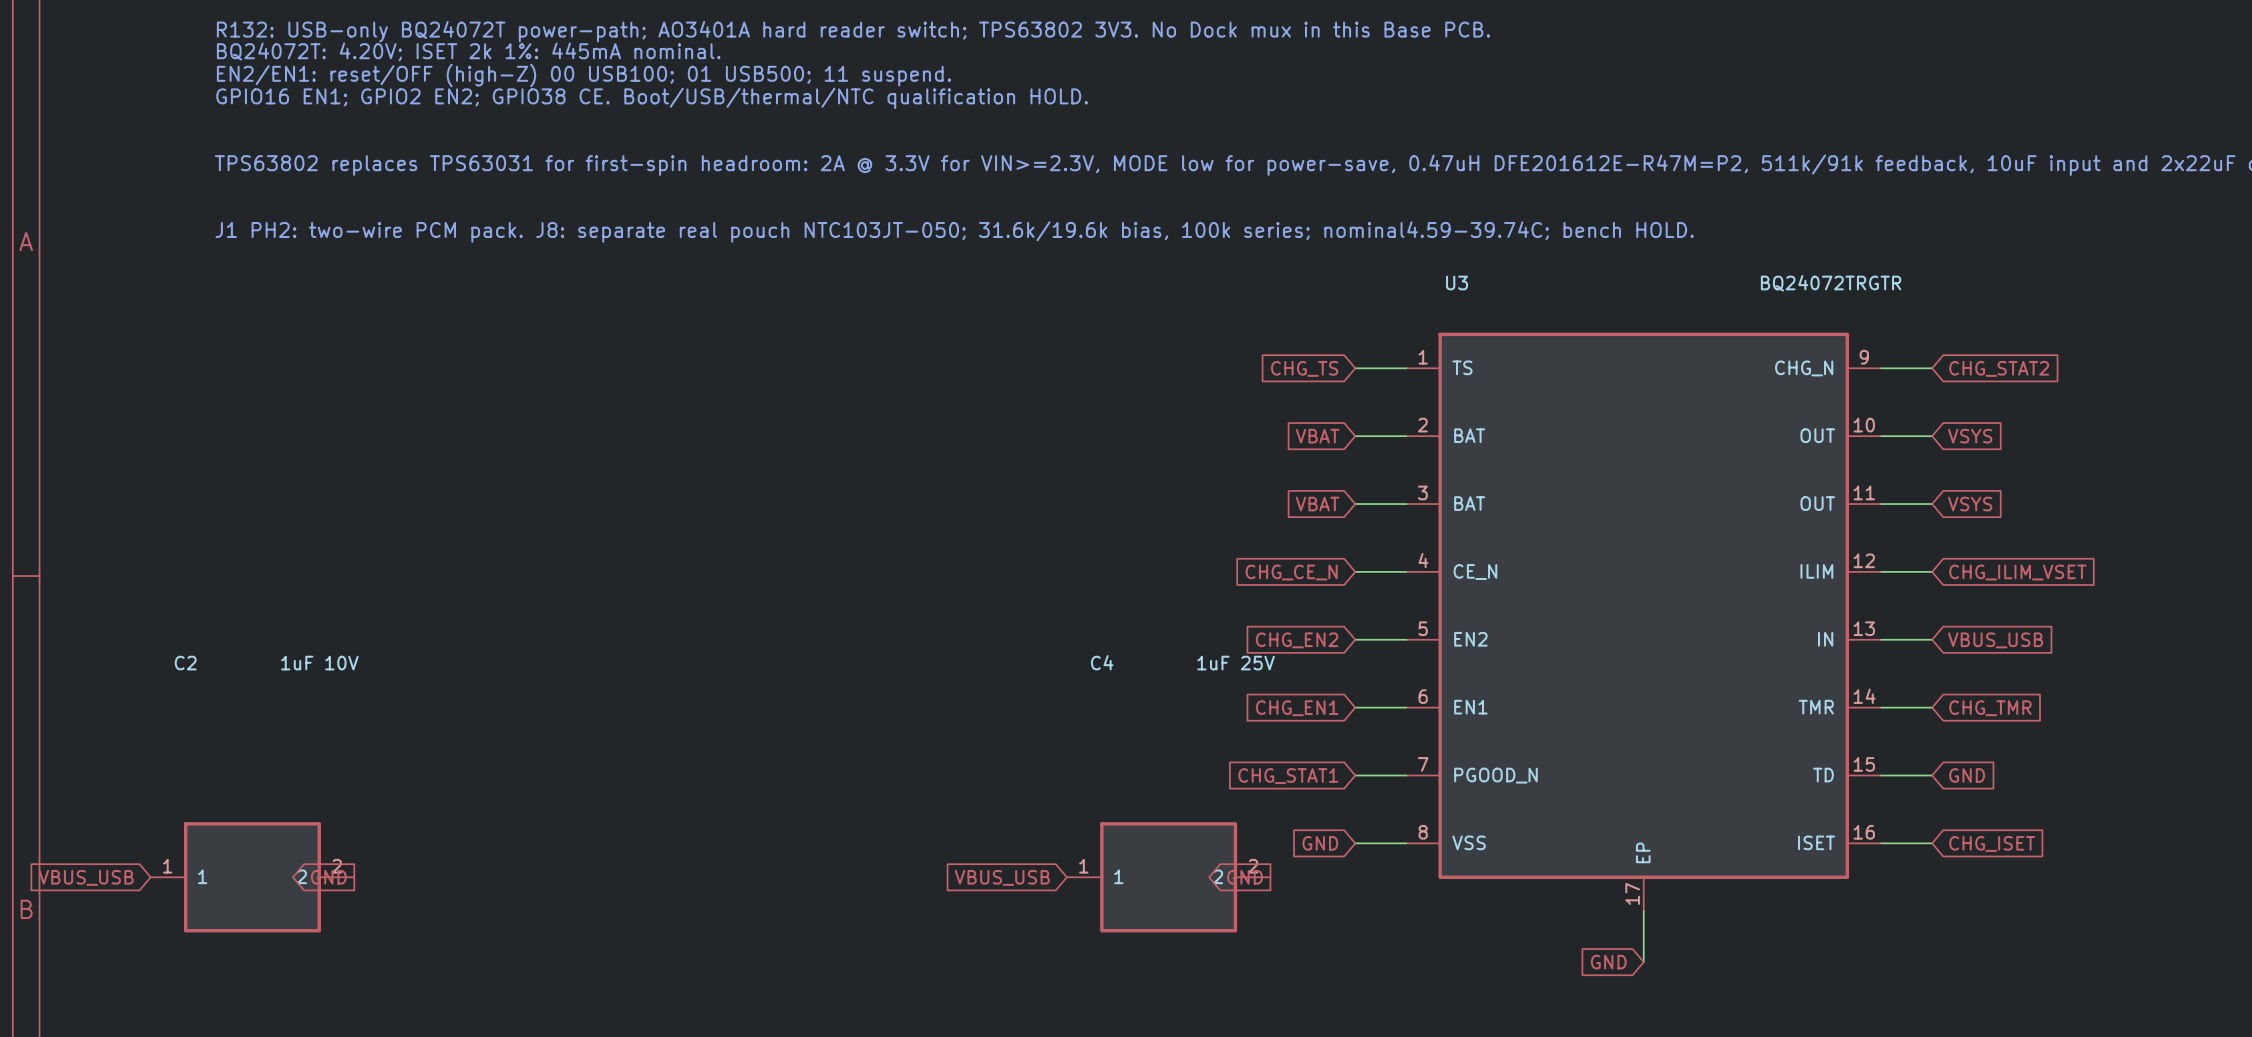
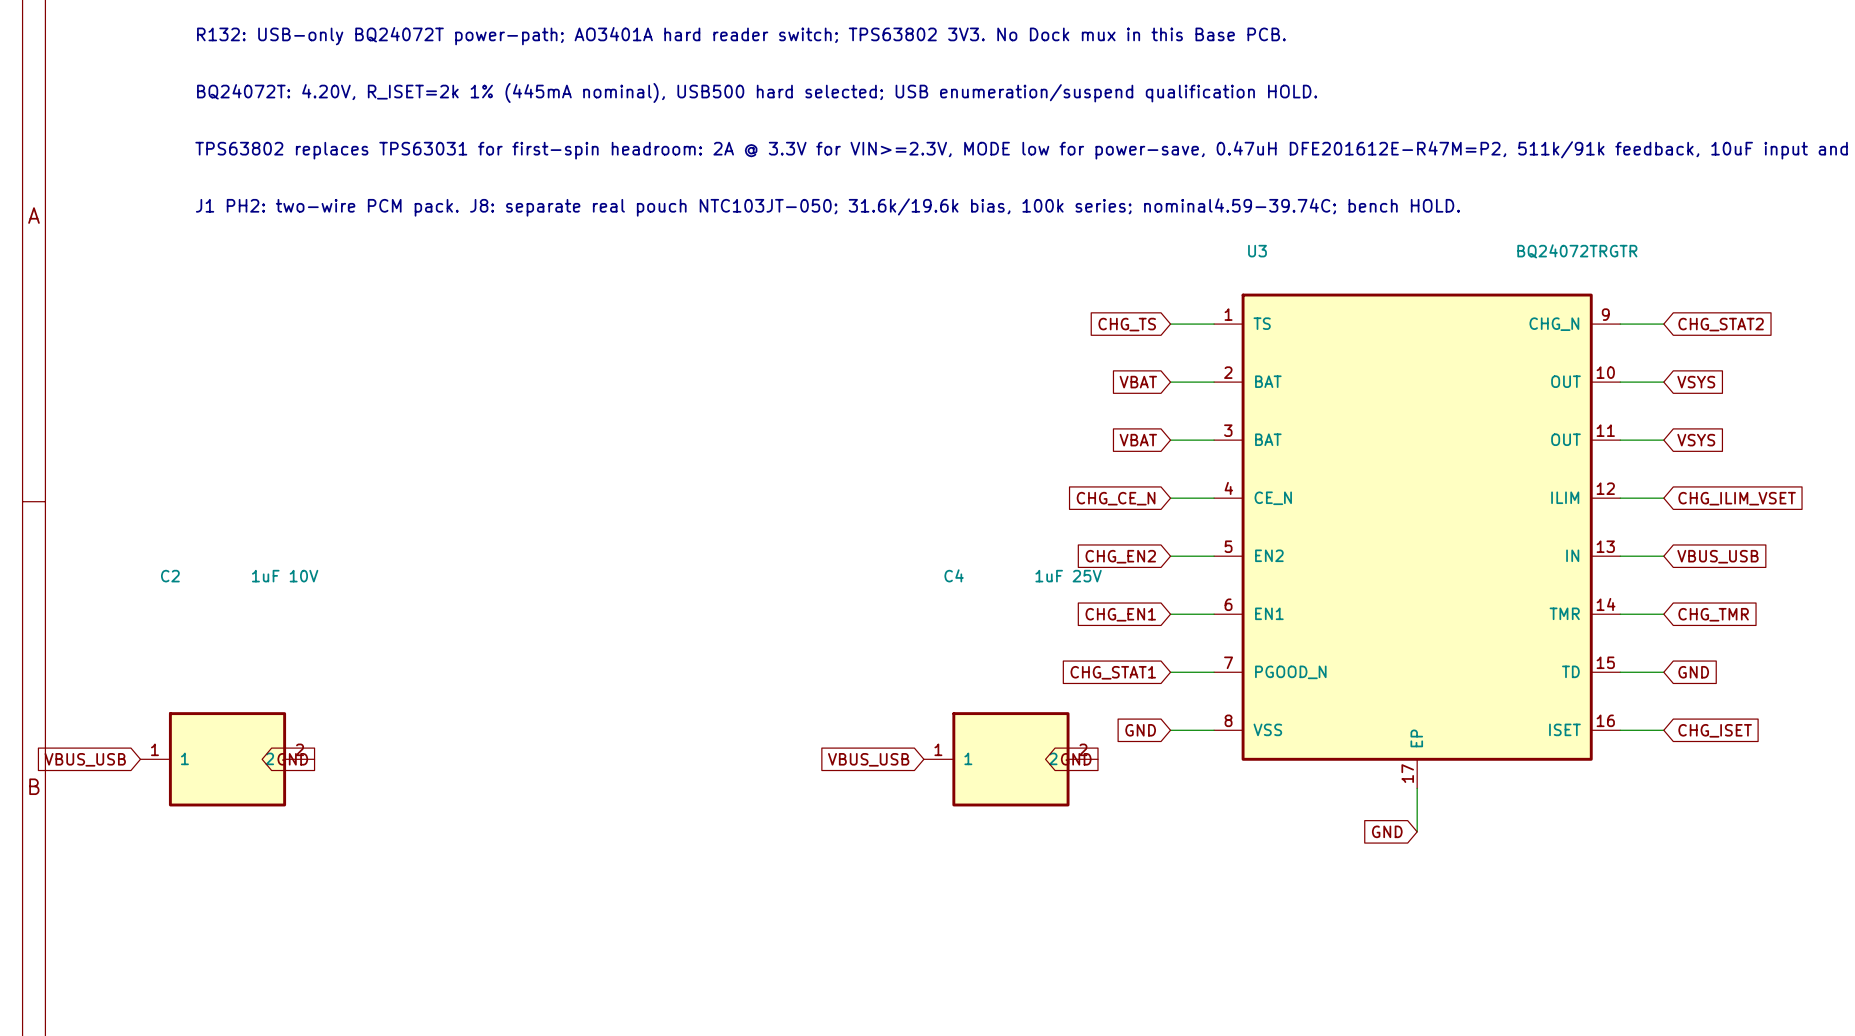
text: BQ24072T: 4.20V; ISET 2k 1%: 445mA nominal. (468, 51) -> none
text: EN2/EN1: reset/OFF (high-Z) 00 USB100; 01 USB500; 11 suspend. (583, 75) -> none
text: GPIO16 EN1; GPIO2 EN2; GPIO38 CE. Boot/USB/thermal/NTC qualification HOLD. (652, 98) -> BQ24072T: 4.20V, R_ISET=2k 1% (445mA nominal), USB500 hard selected; USB enumeration/suspend qualification HOLD. (757, 92)

